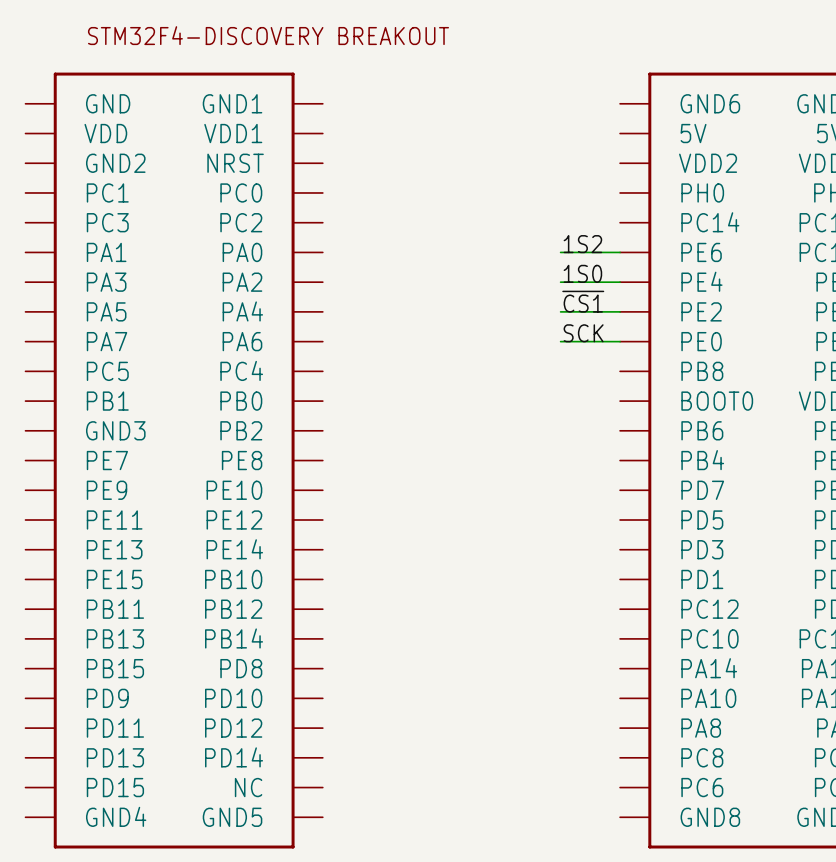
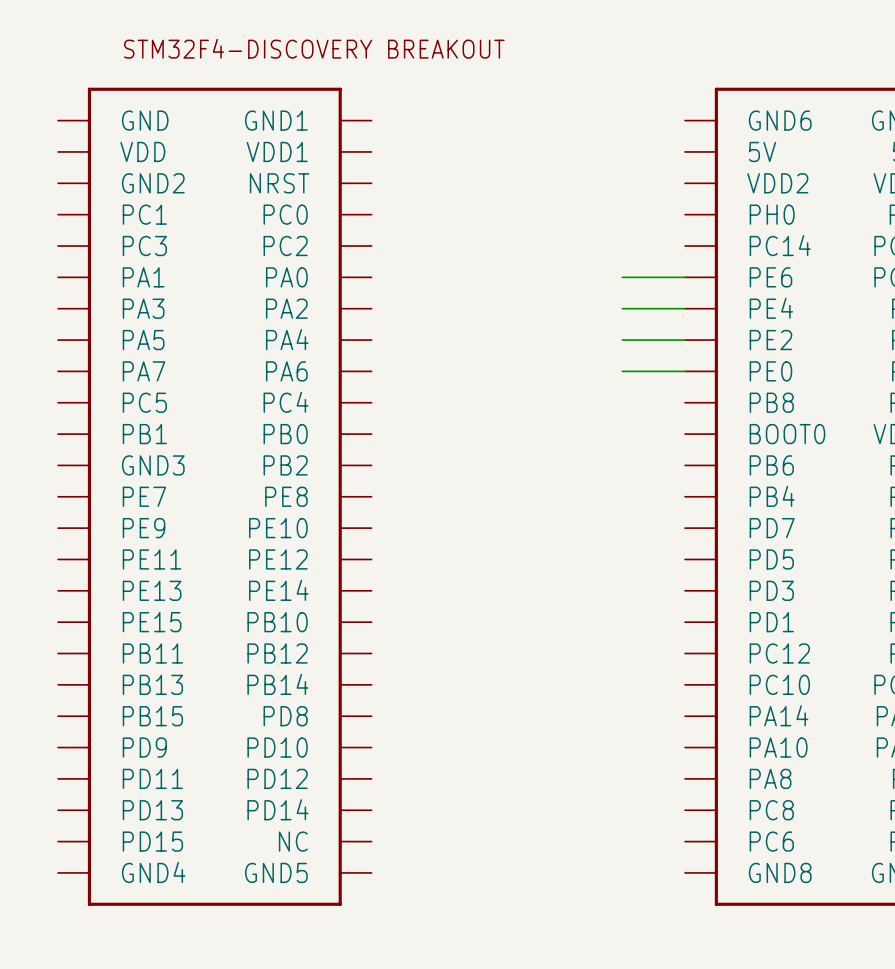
label: 1S2 (582, 244) -> none
label: 1S0 (582, 273) -> none
label: ~{CS1} (583, 301) -> none
label: SCK (583, 333) -> none

